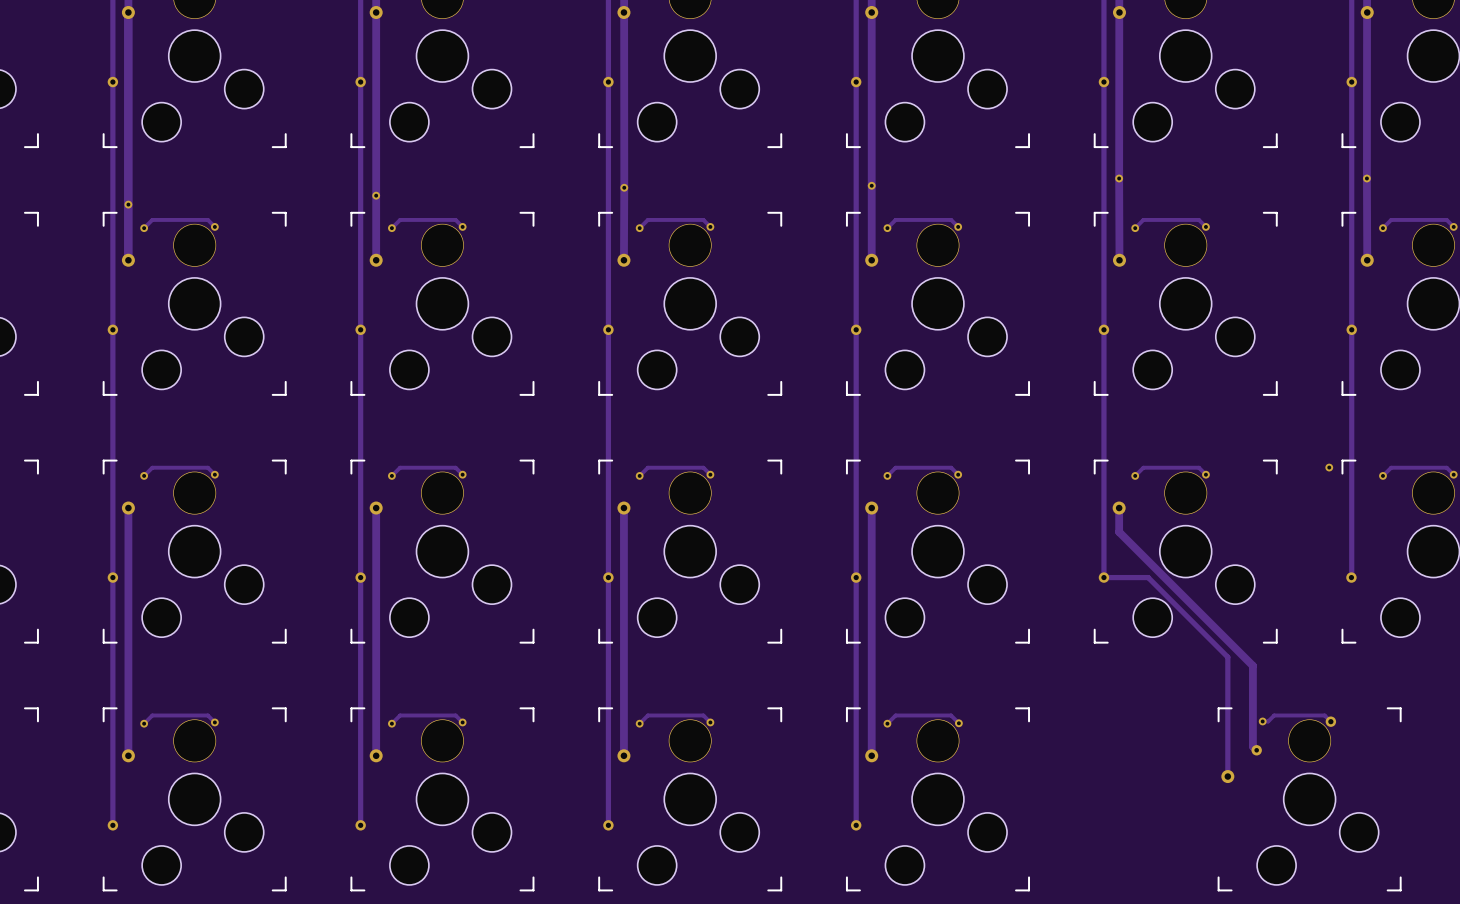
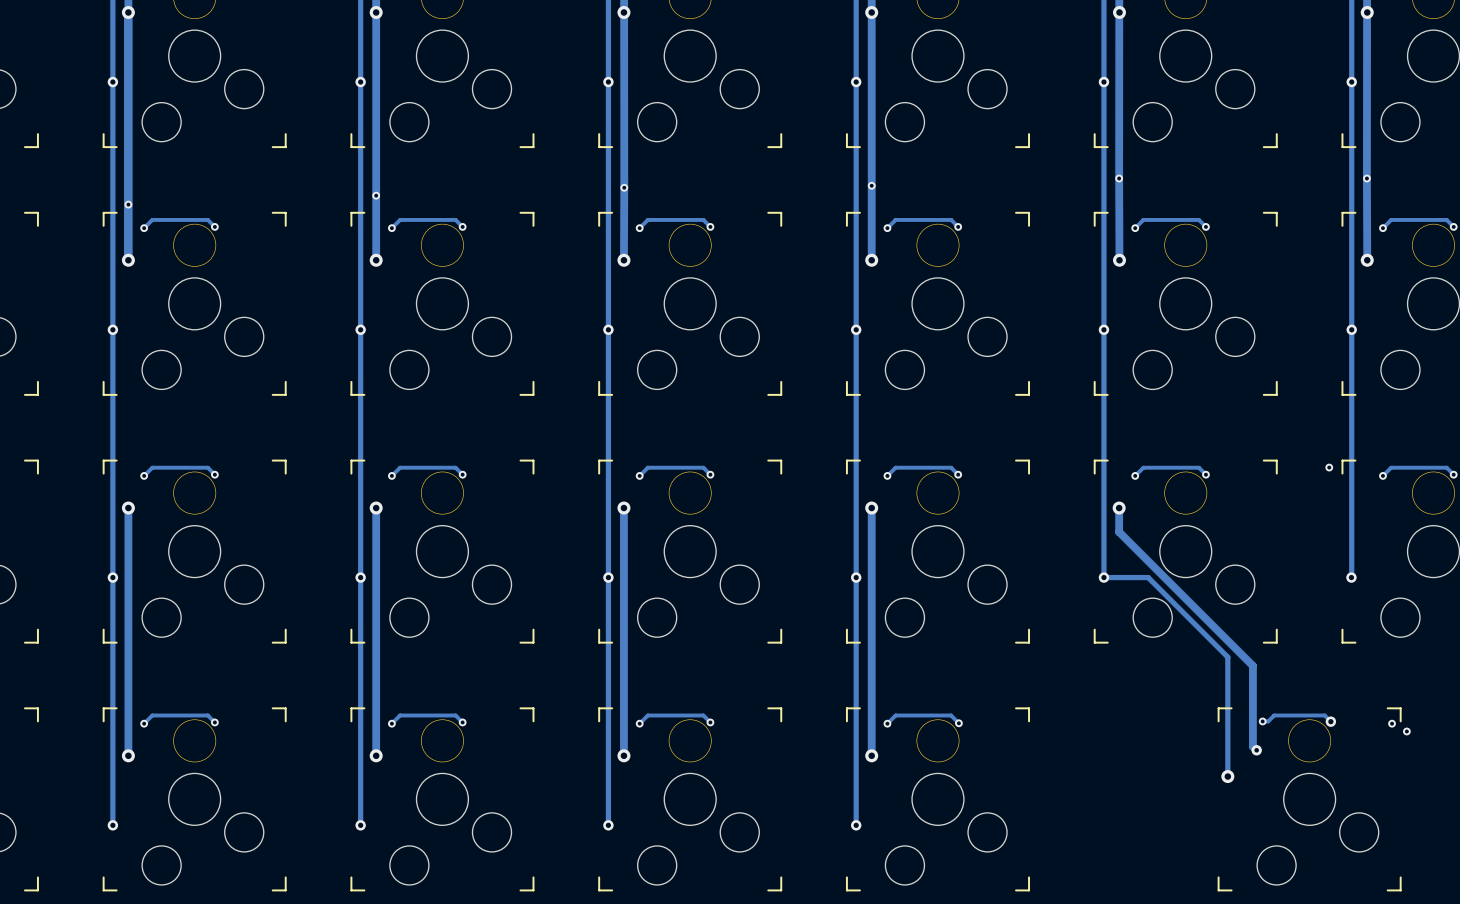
via: none -> (1392, 723)
via: none -> (1406, 731)

